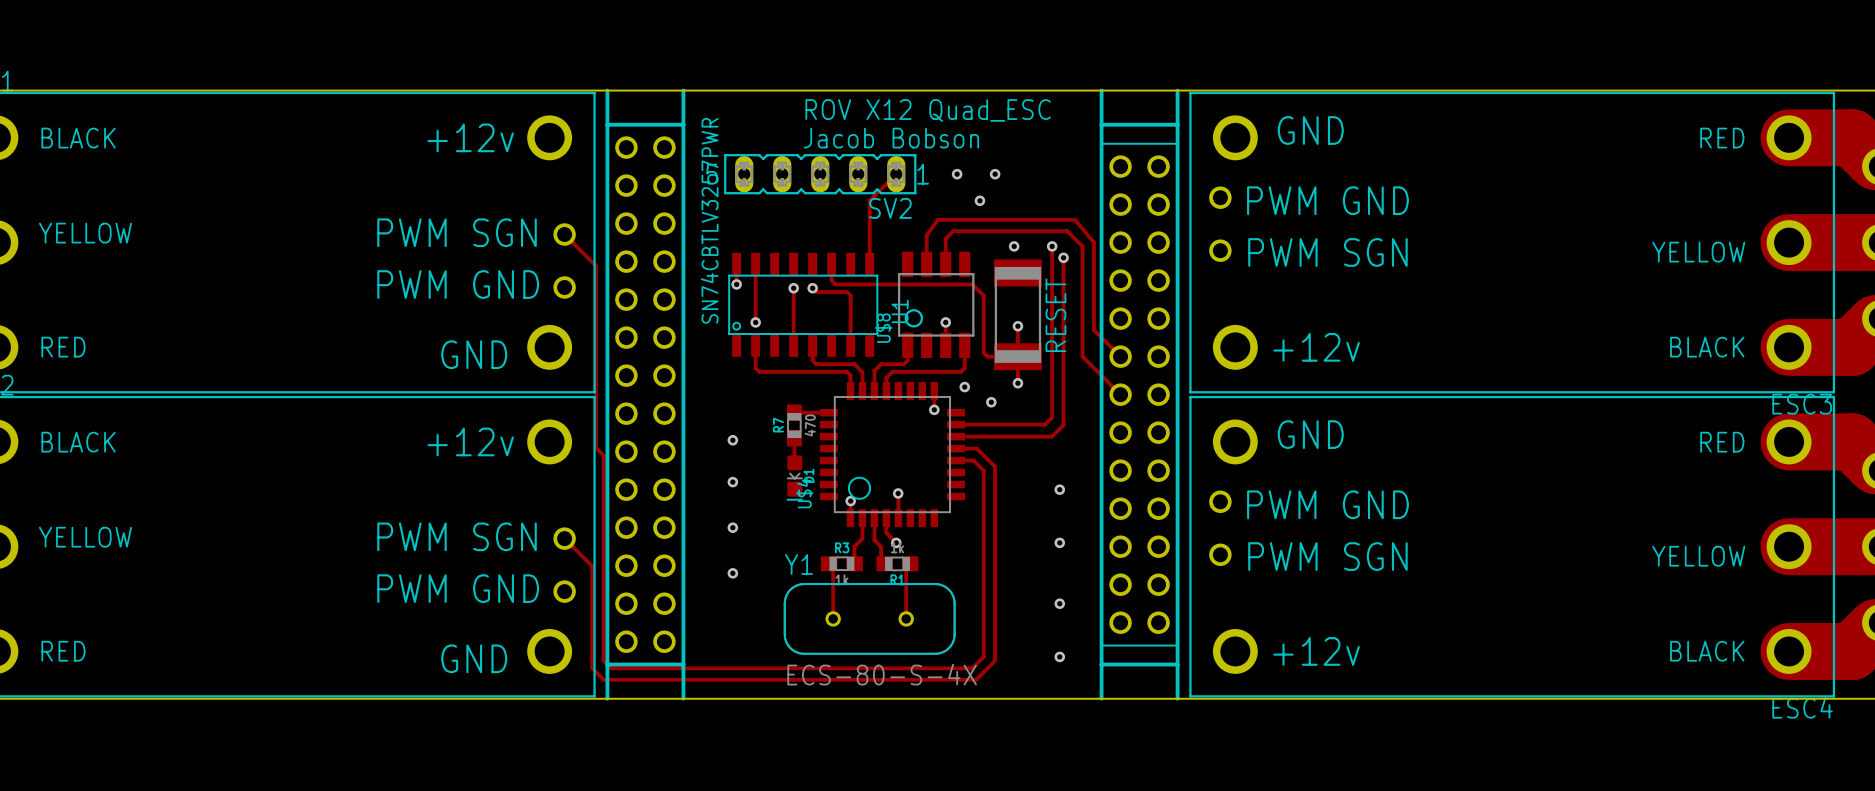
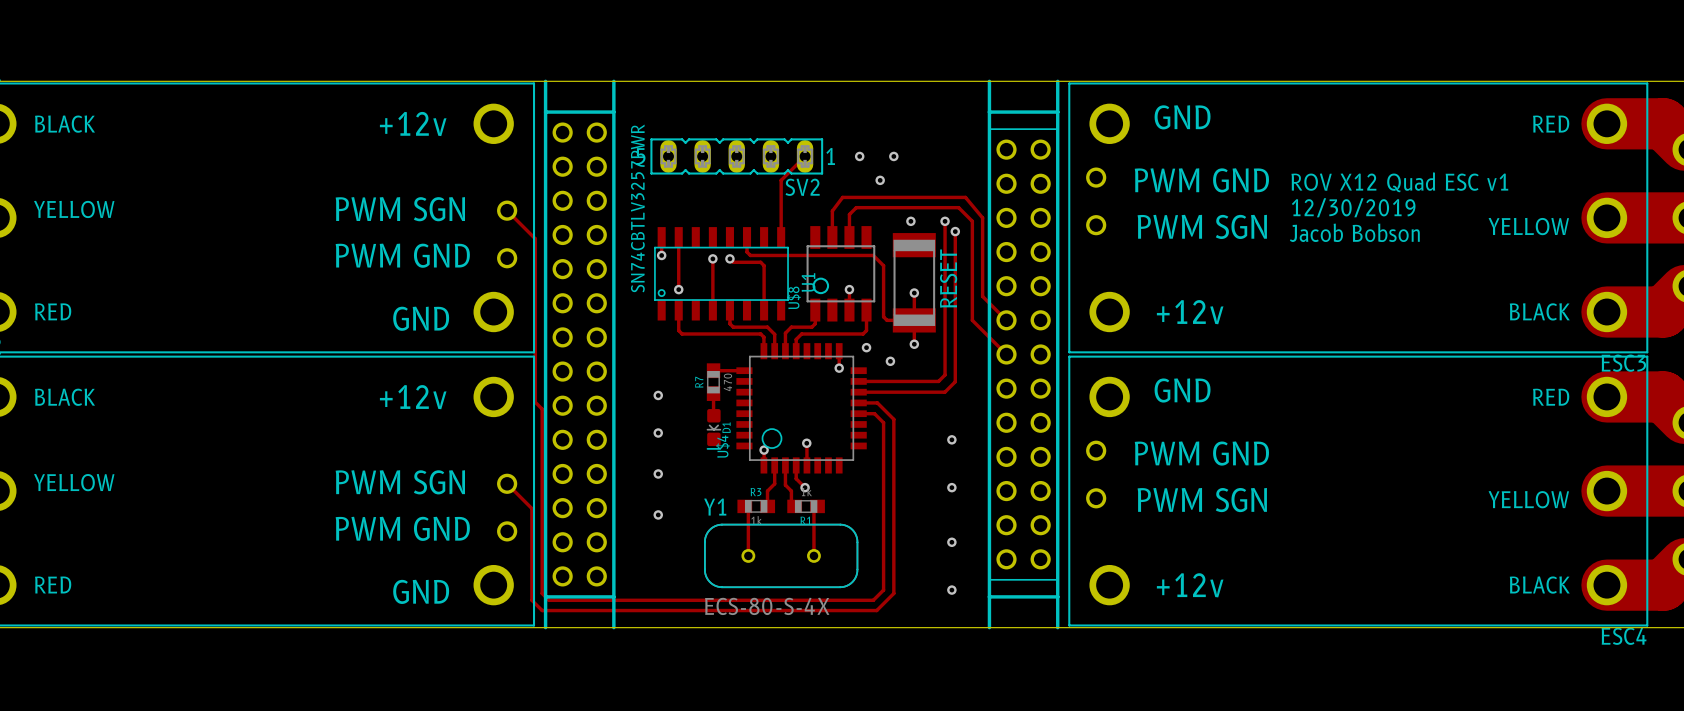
text: ROV X12 Quad_ESC (928, 110) -> none
text: Jacob Bobson (891, 138) -> none
text: none -> ROV X12 Quad ESC v1 (1399, 182)
text: none -> 12/30/2019 (1353, 207)
text: none -> Jacob Bobson (1354, 232)

